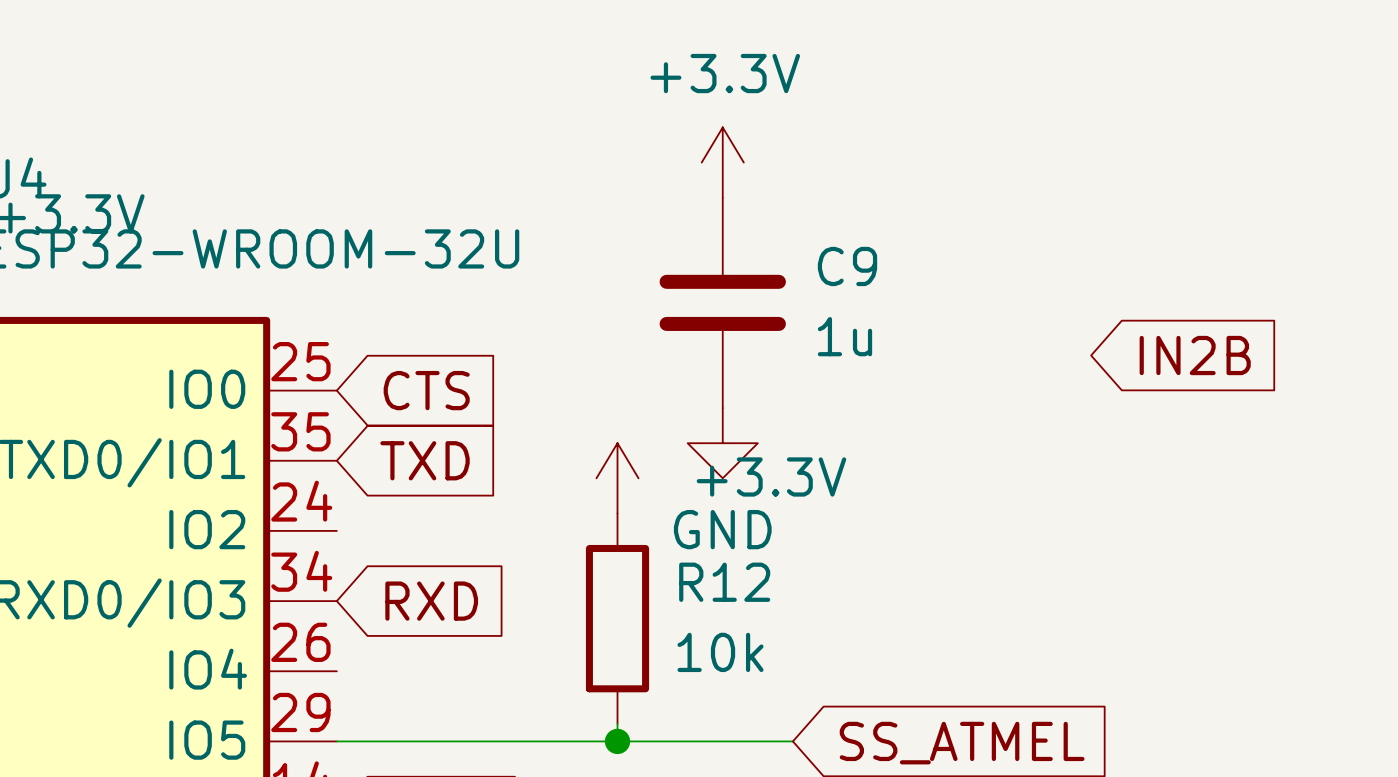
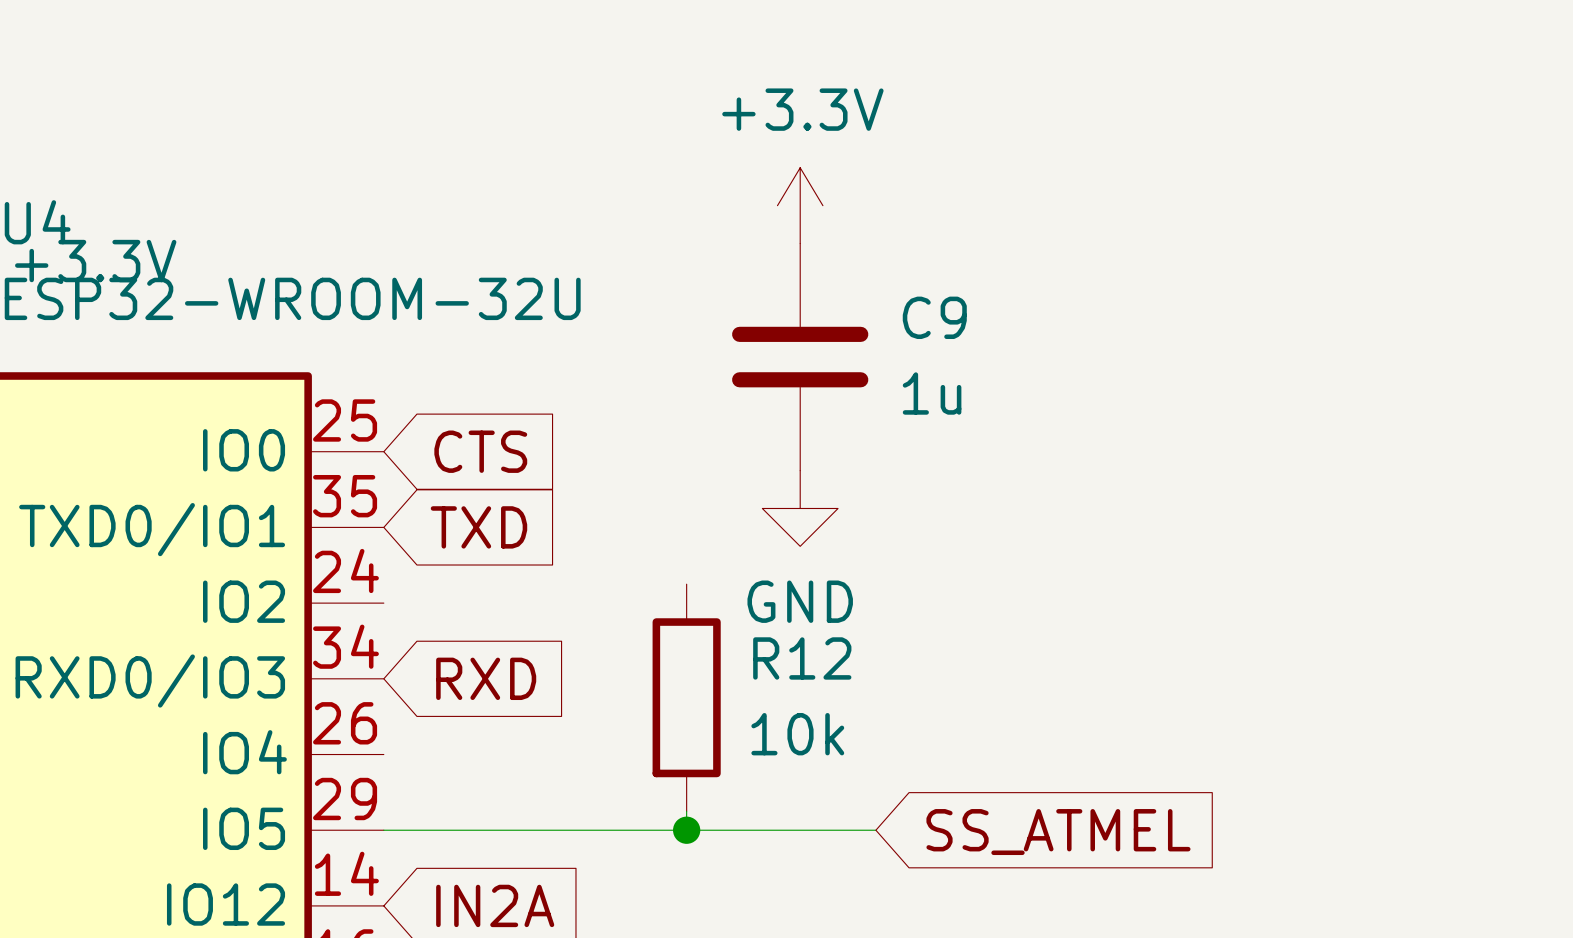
global label: IN2B (1195, 355) -> none
power symbol: +3.3V (617, 478) -> none

